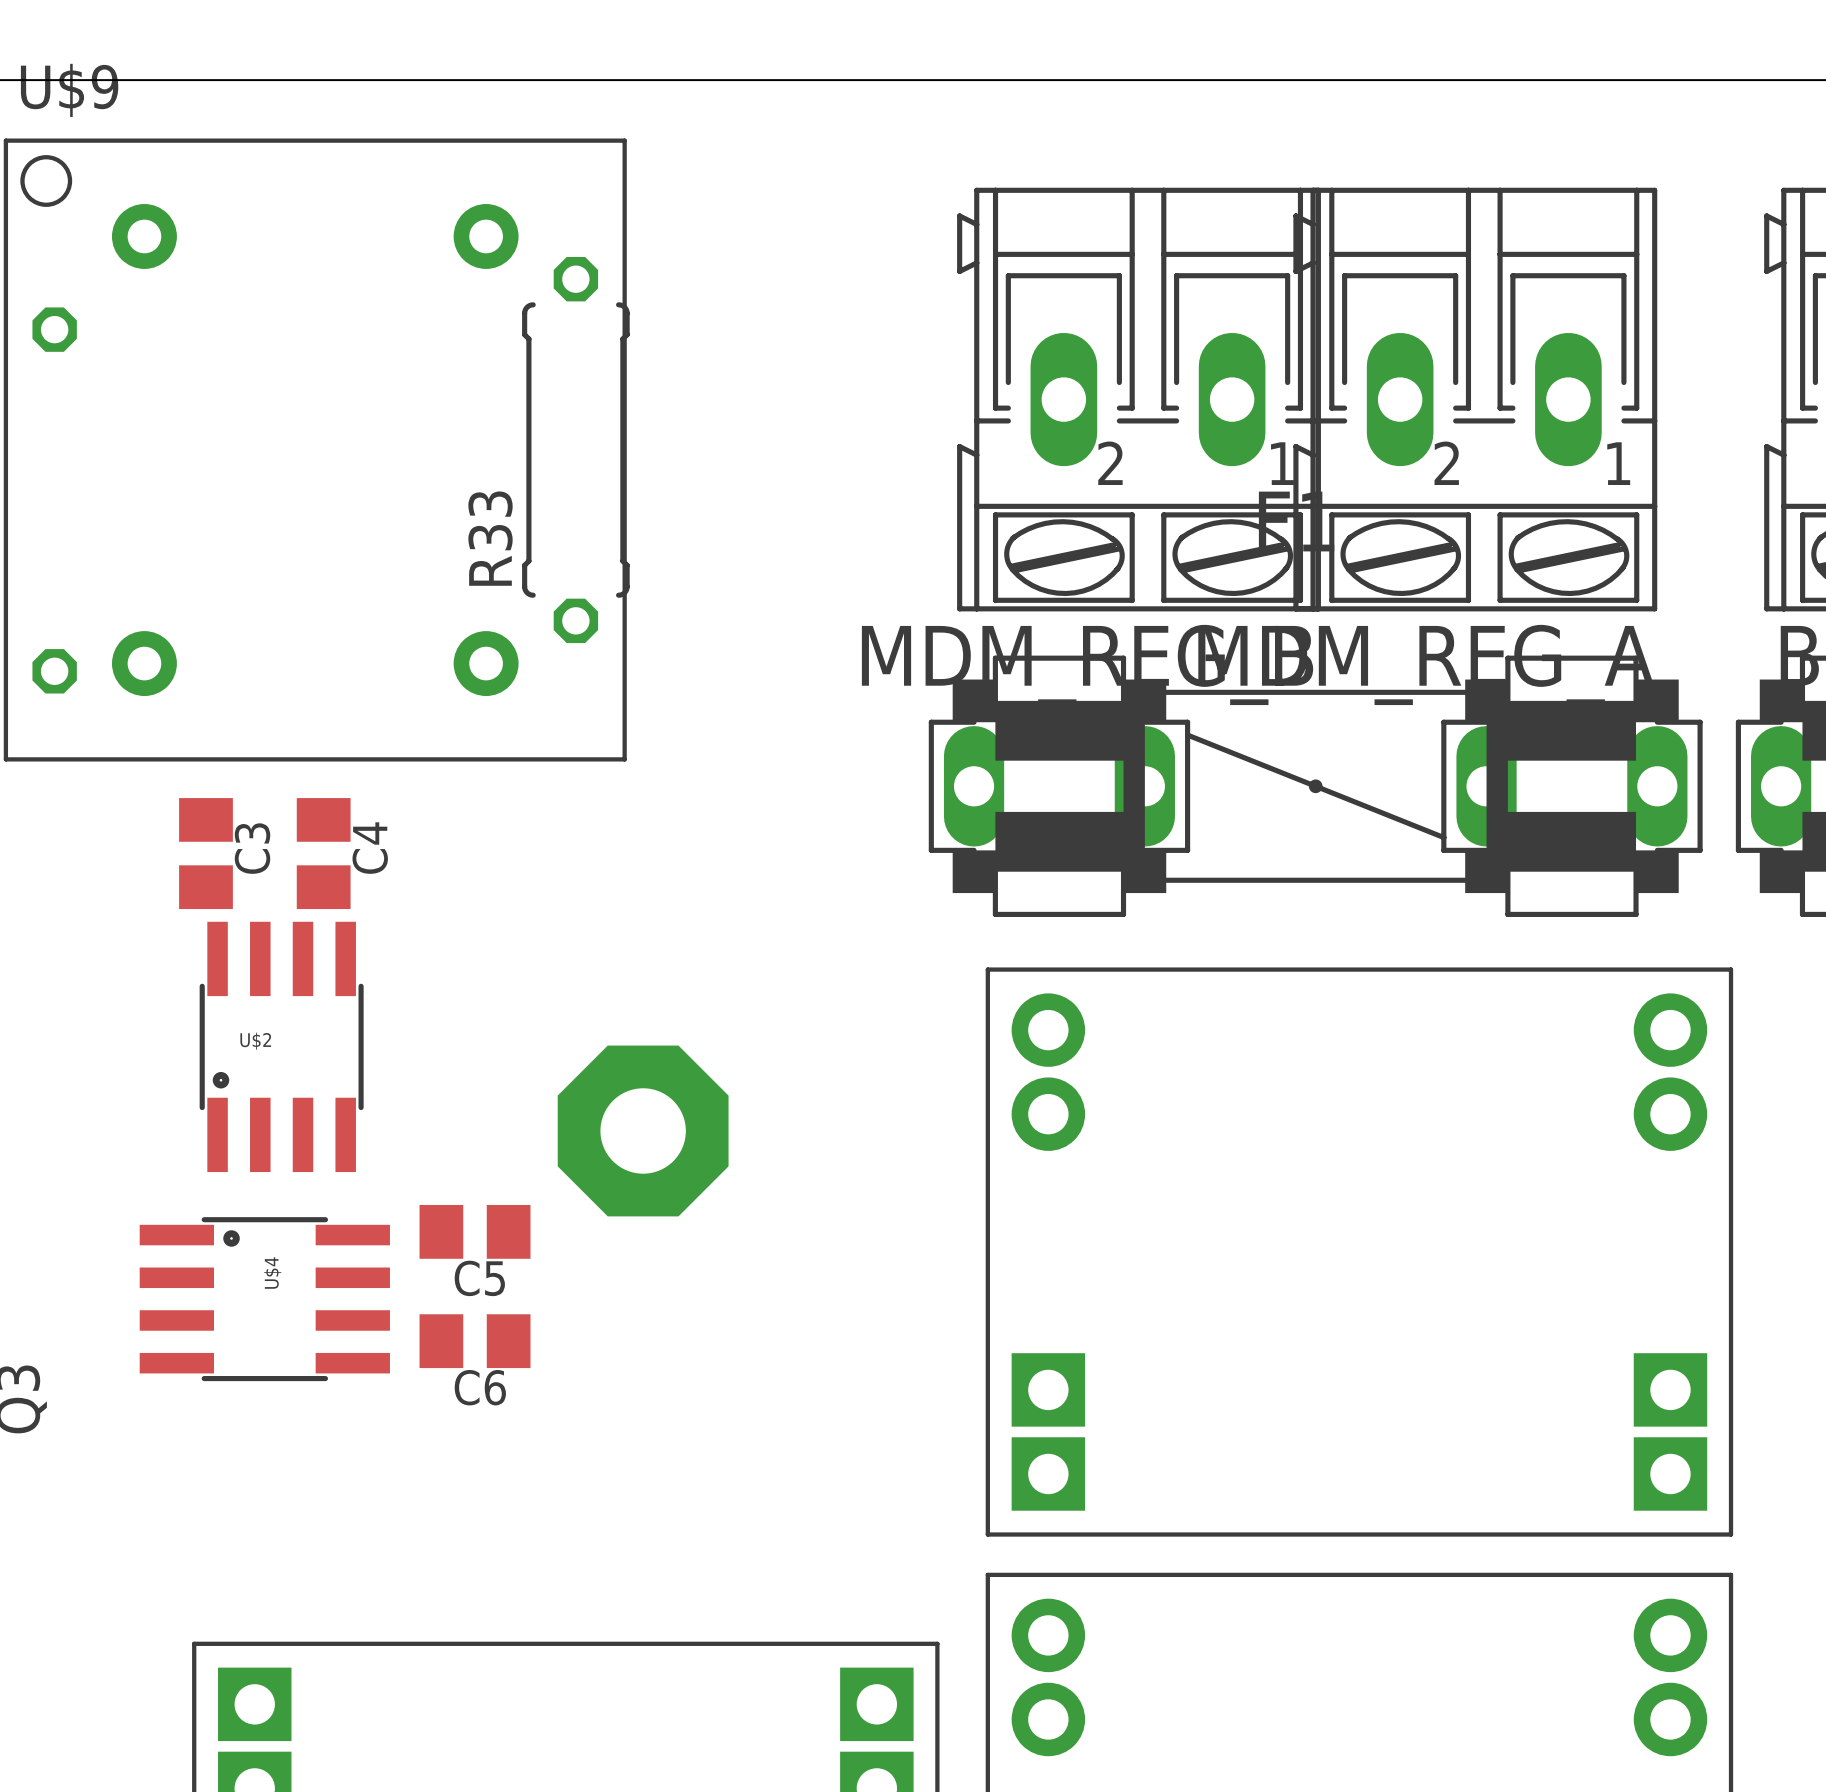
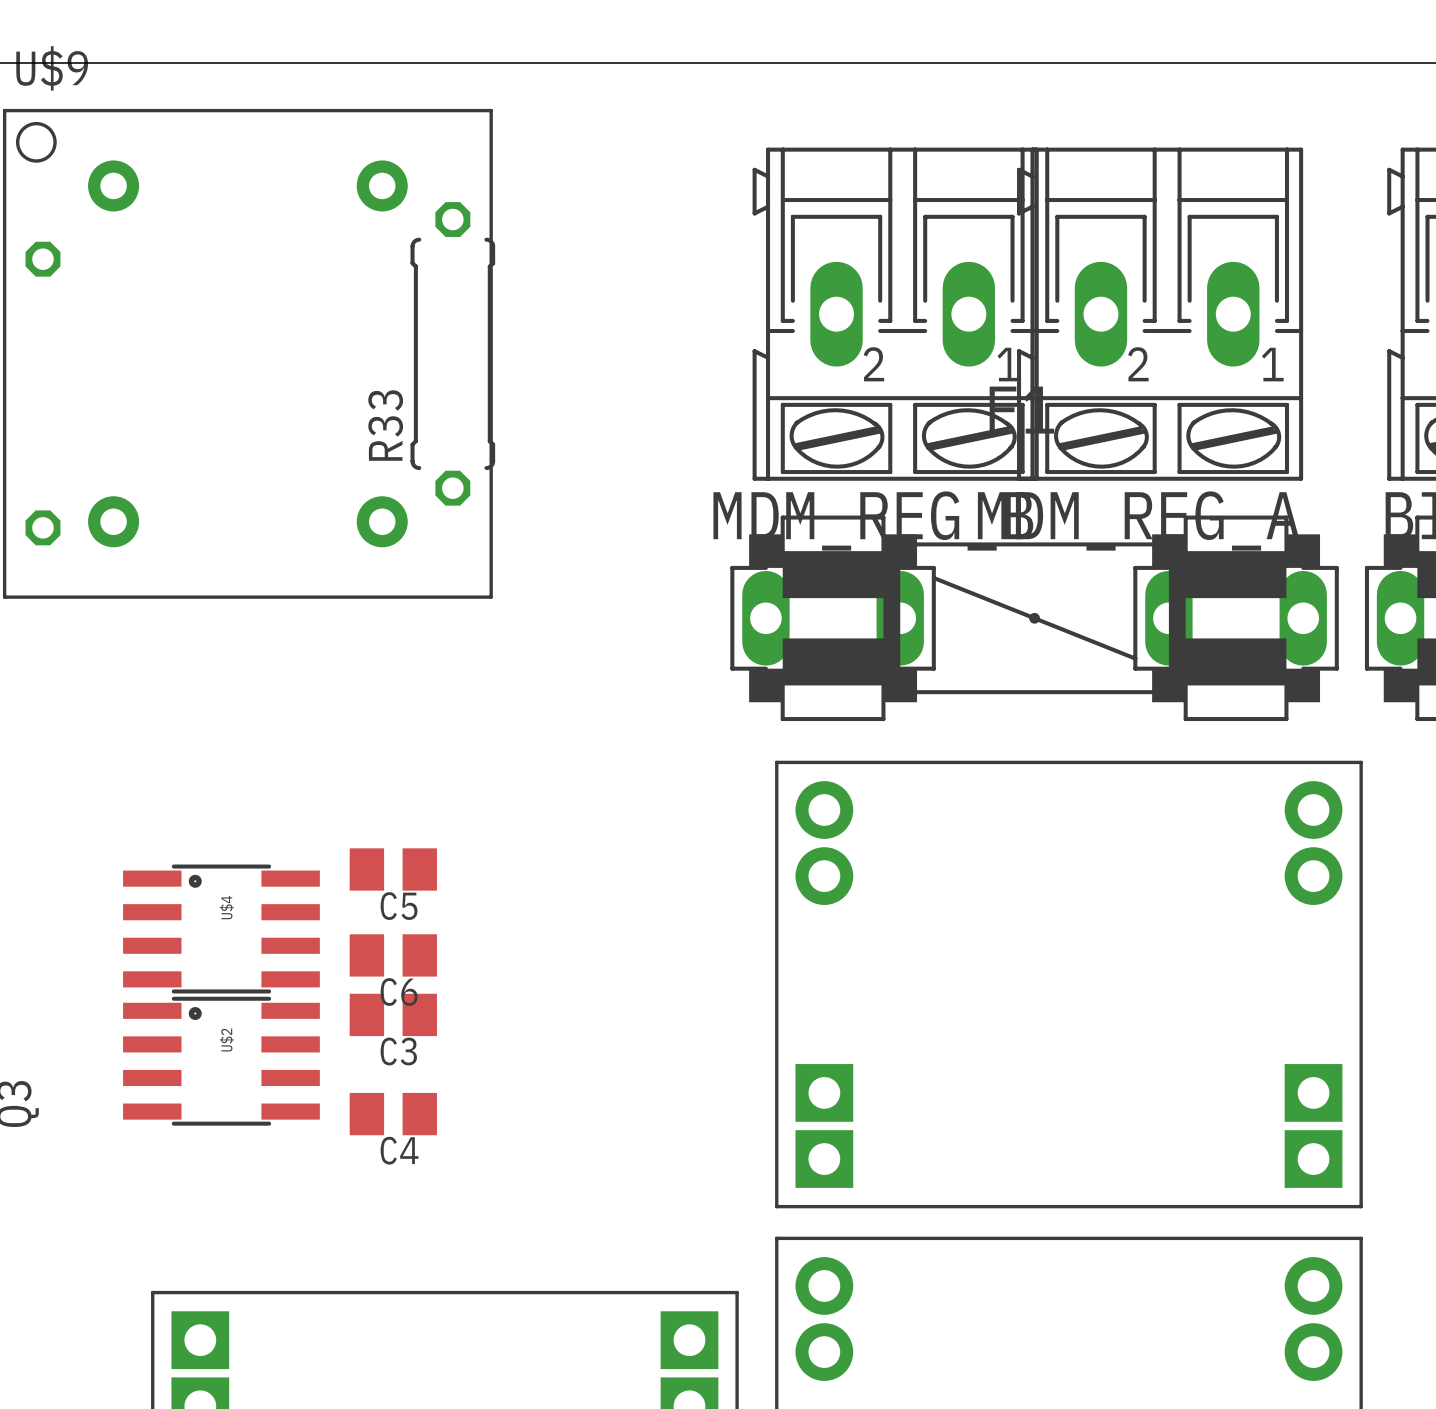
C3 rotation: 0° (205, 853) -> 90° clockwise (393, 1014)
C3 position: (205, 853) -> (393, 1014)
C4 rotation: 0° (323, 853) -> 90° clockwise (393, 1114)
C4 position: (323, 853) -> (393, 1114)
U$2 rotation: 0° (281, 1046) -> 90° clockwise (221, 1061)
U$2 position: (281, 1046) -> (221, 1061)
part: (643, 1130) -> none
C5 position: (475, 1231) -> (393, 869)
U$4 position: (264, 1299) -> (221, 928)
C6 position: (475, 1341) -> (393, 955)

